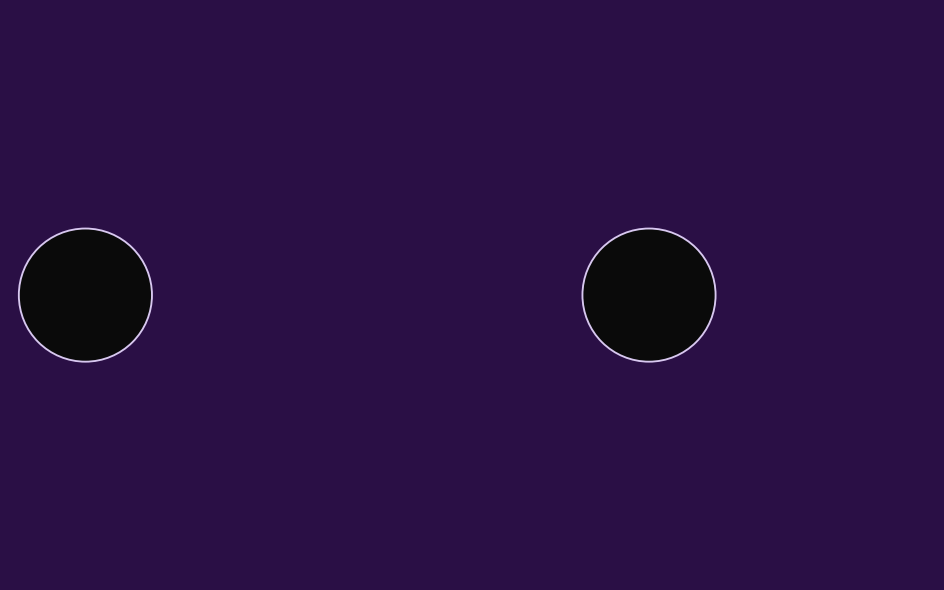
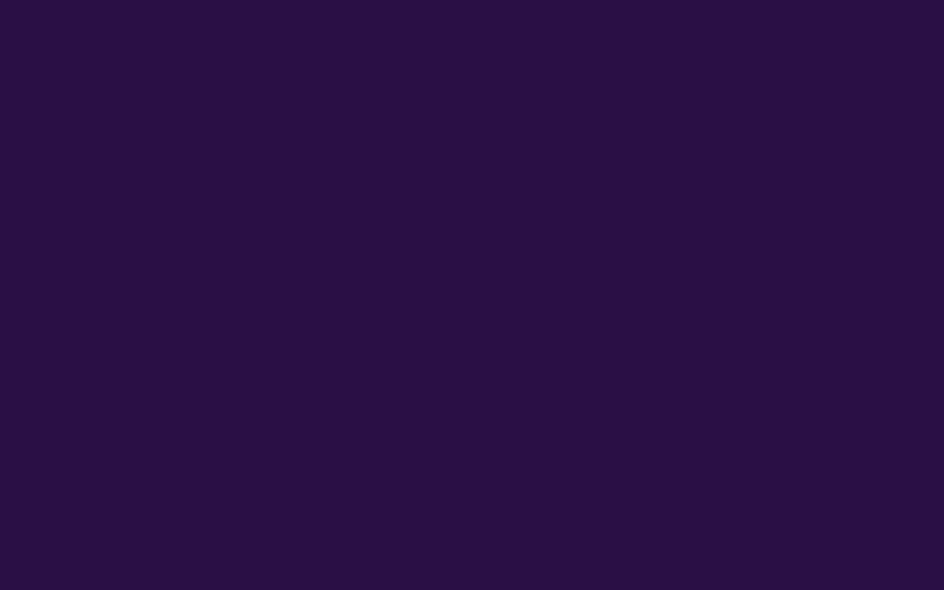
part: (85, 295) -> none
part: (649, 295) -> none

